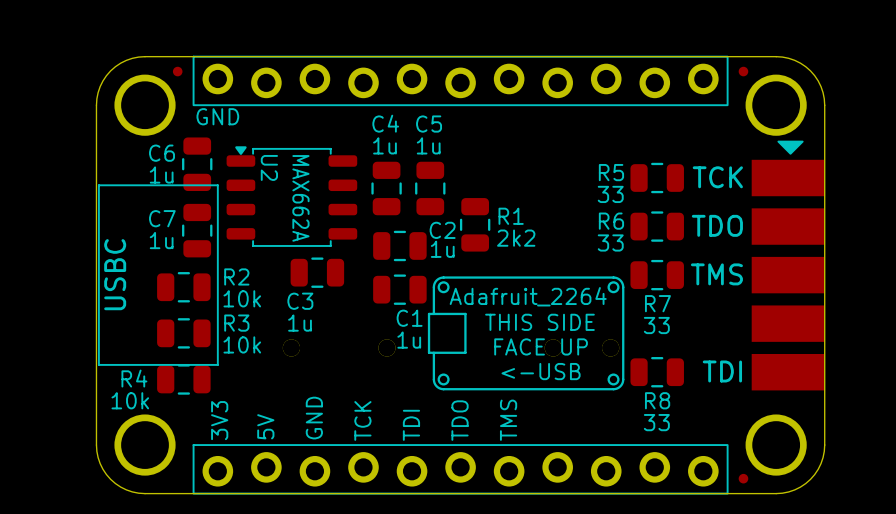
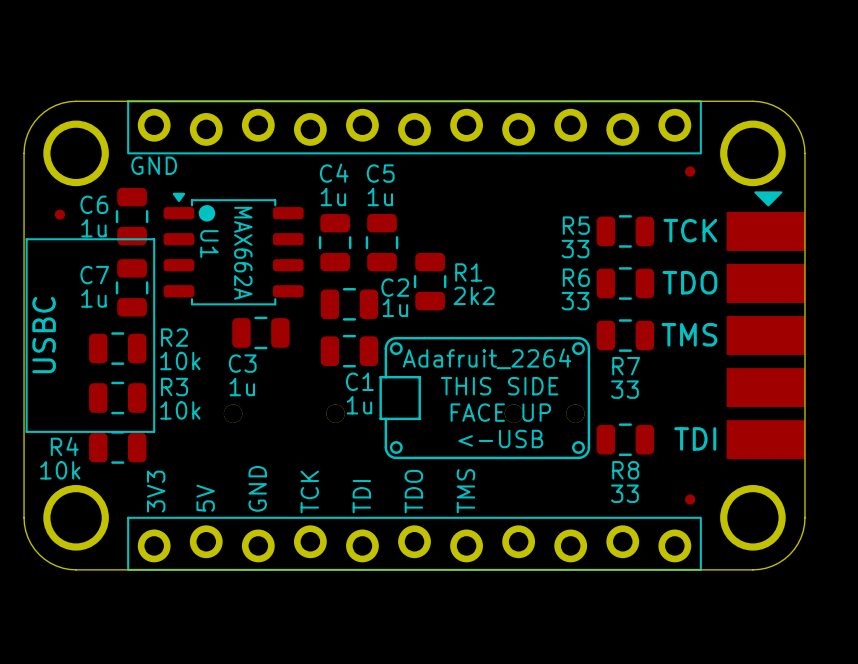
part position: (177, 71) -> (59, 214)
part position: (743, 71) -> (690, 171)
U1: none -> MAX662A (233, 249)
U2: MAX662A (291, 196) -> none
part position: (743, 478) -> (690, 499)

